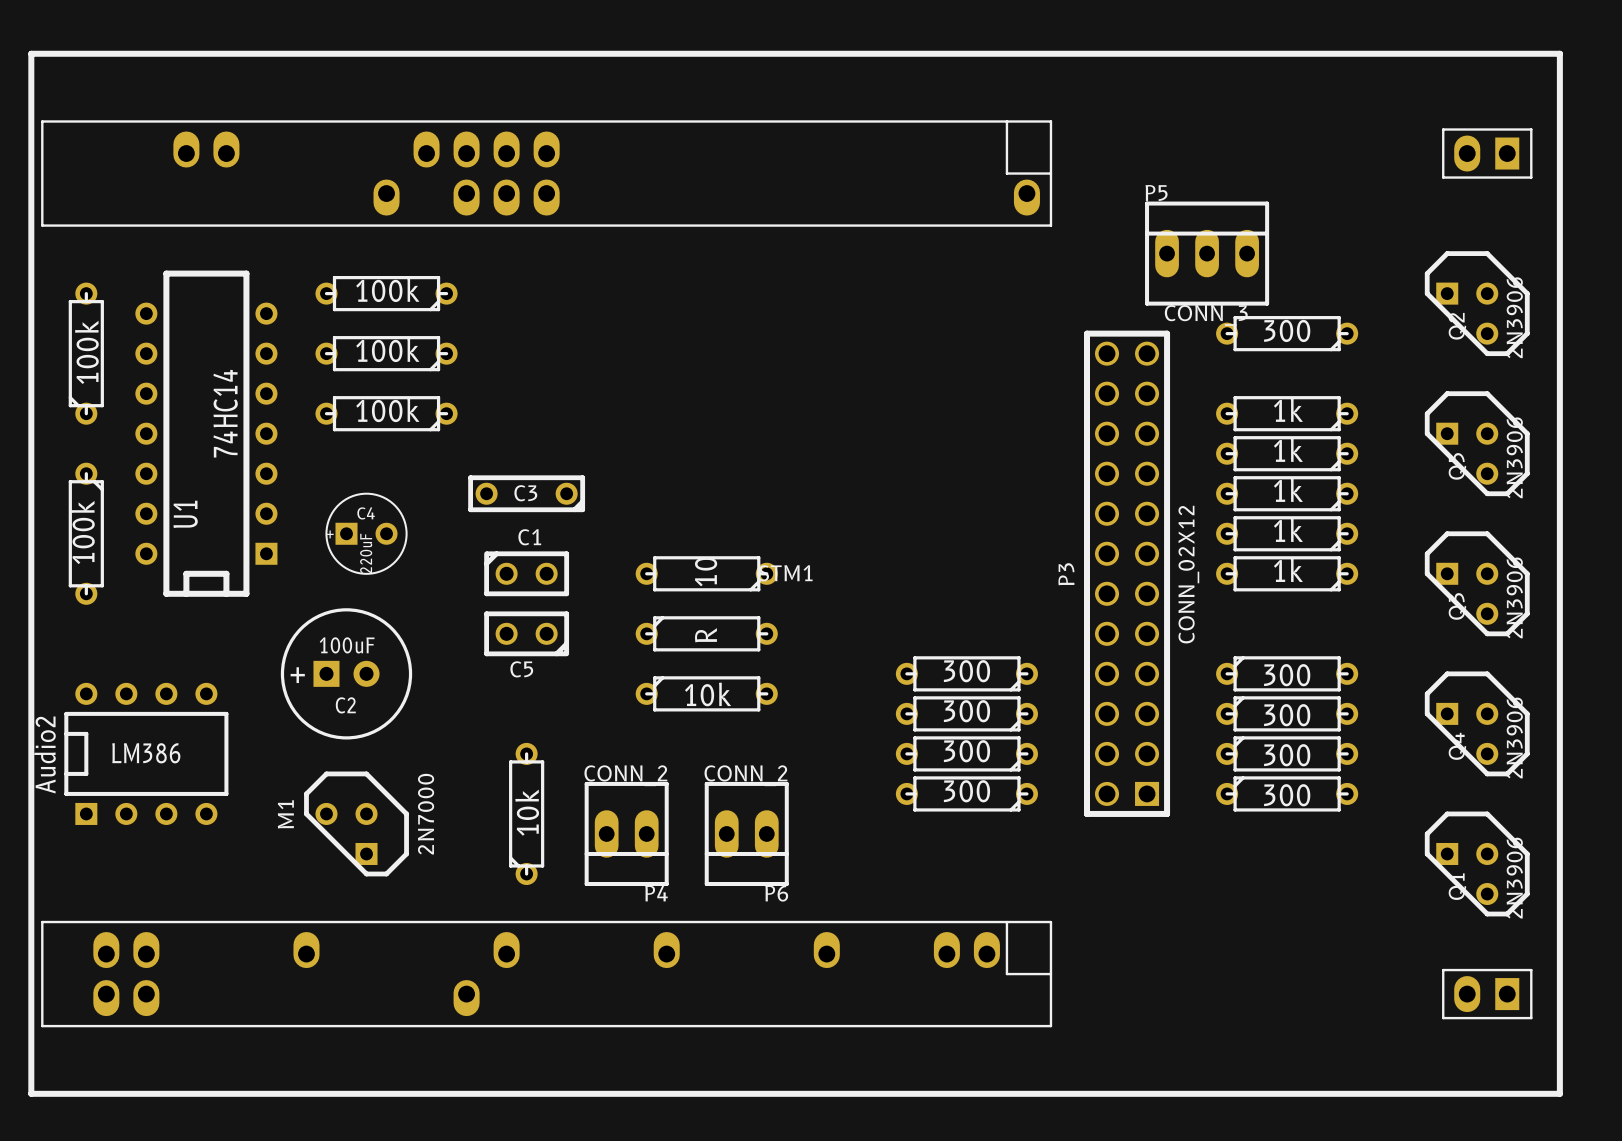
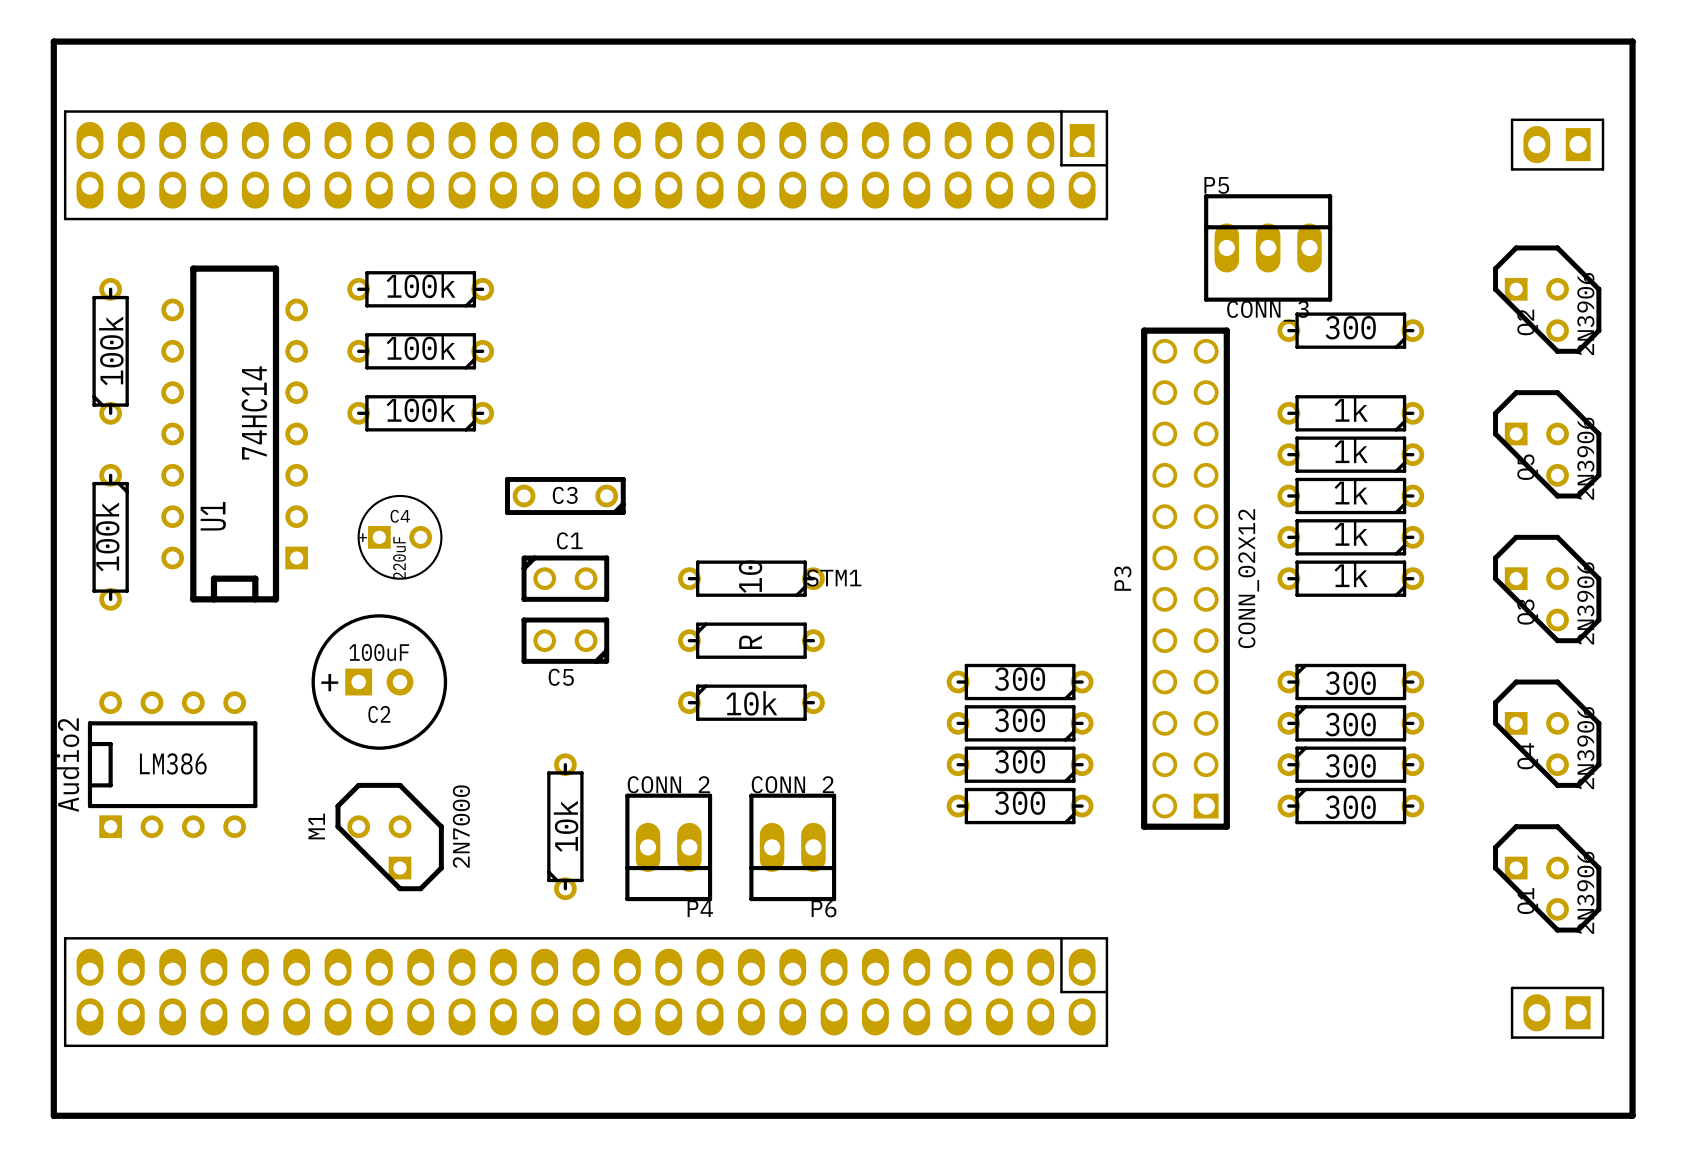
STM1 footprint: [28, 50, 1563, 1097] -> [50, 38, 1636, 1119]

